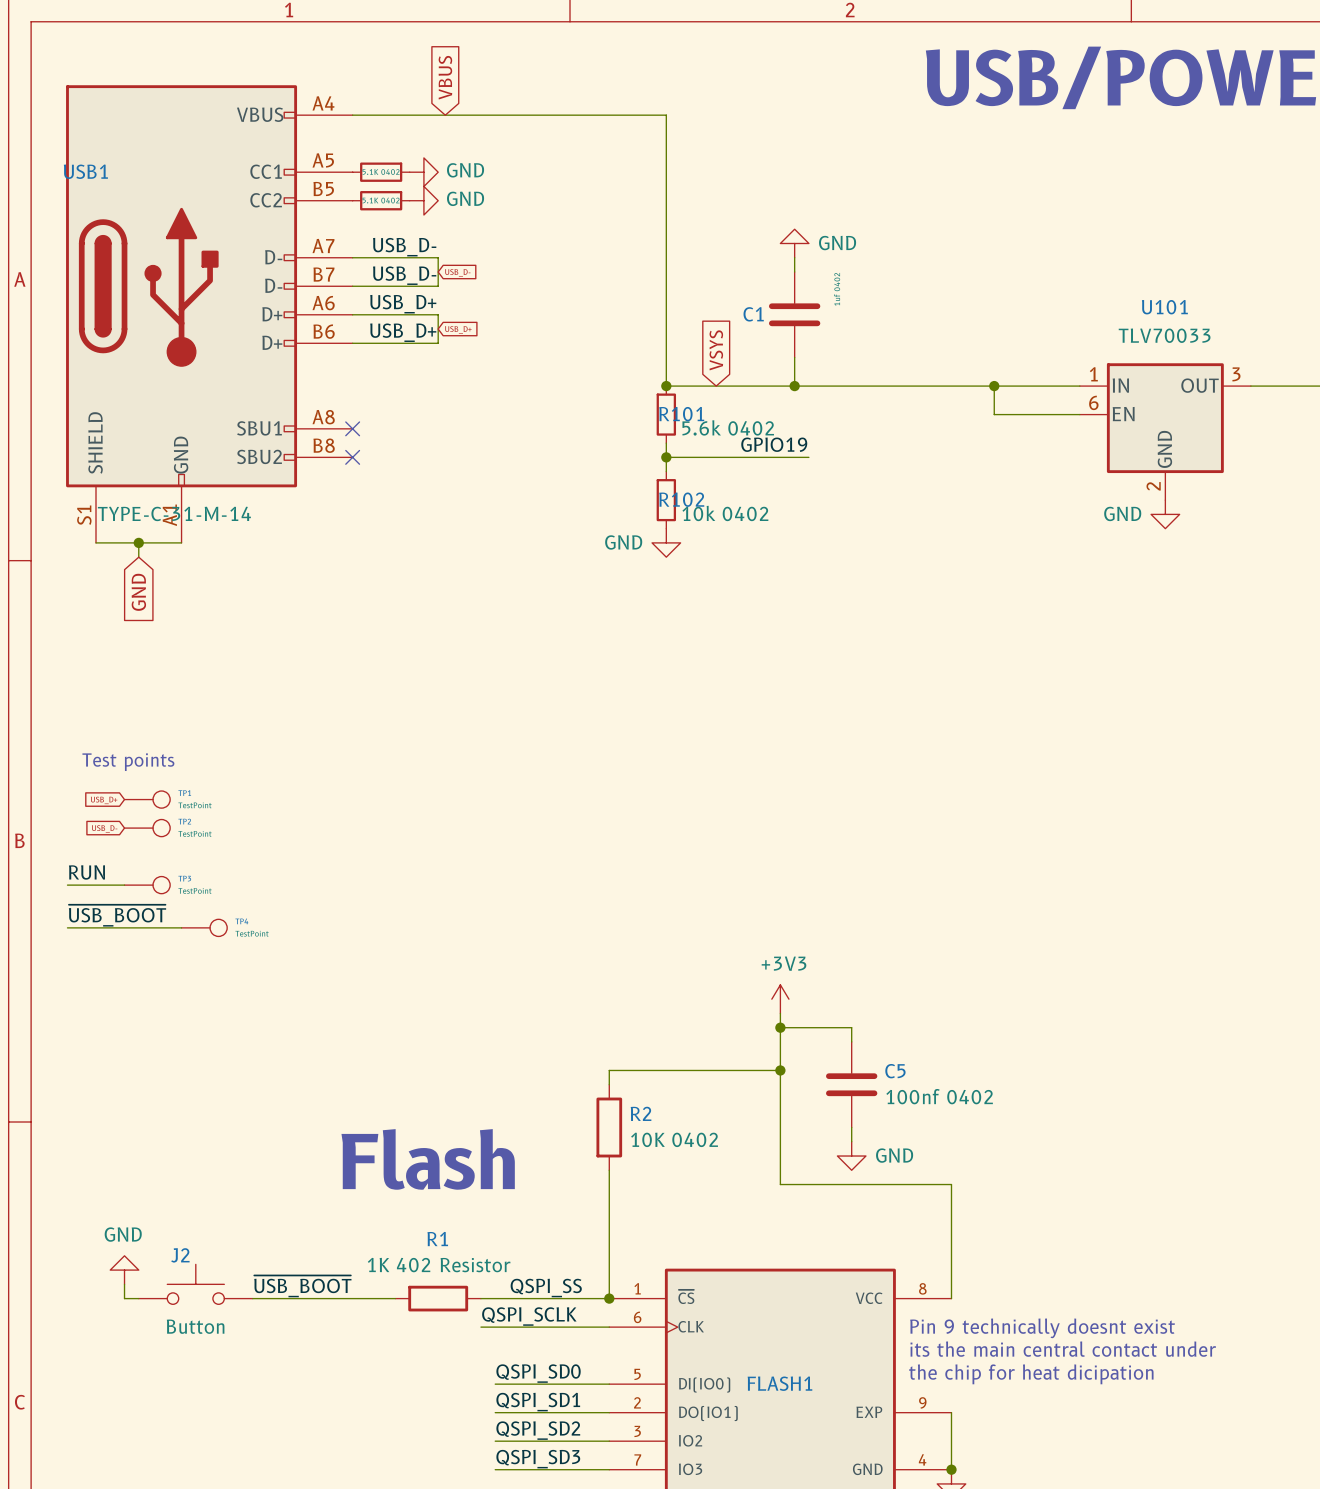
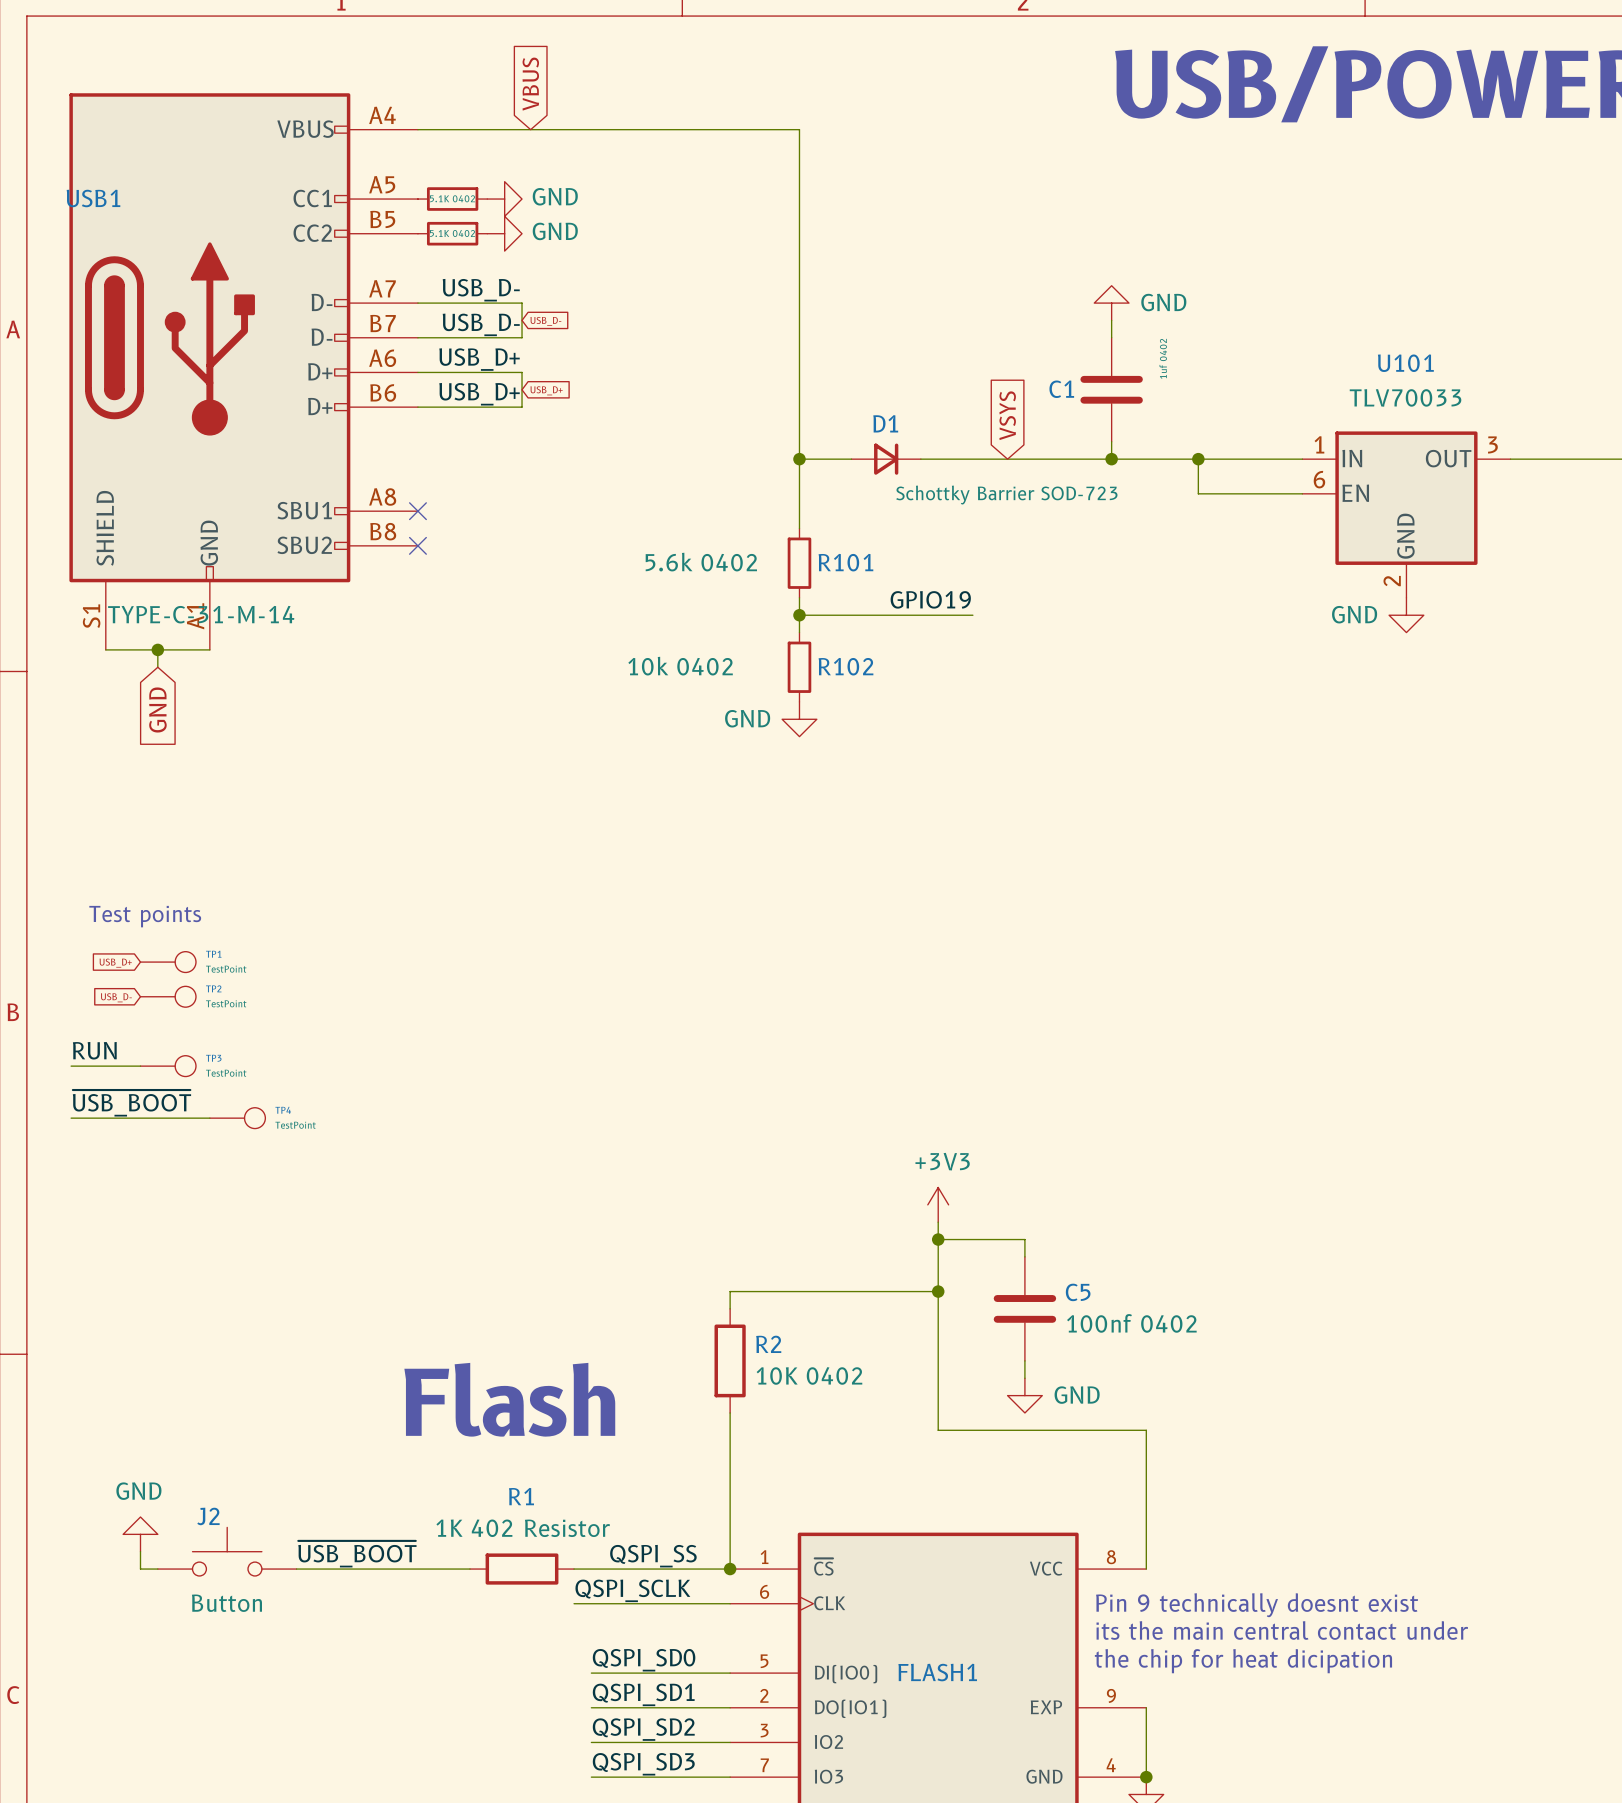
power symbol position: GND (794, 243) -> GND (1111, 303)
wire: (794, 257) (794, 272) -> (1111, 320) (1111, 337)
C1 position: (794, 314) -> (1111, 389)
global label position: VSYS (716, 350) -> VSYS (1007, 415)
wire: (794, 357) (794, 386) -> (799, 597) (799, 632)
wire: none -> (1111, 441) (1111, 459)
D1: none -> Schottky Barrier SOD-723 (886, 459)
junction: (794, 386) -> none
junction: none -> (1111, 459)
R101 position: (666, 414) -> (799, 563)
R101 name position: R101 (681, 414) -> R101 (845, 562)
R101 value position: 5.6k 0402 (728, 427) -> 5.6k 0402 (701, 562)
wire: (666, 443) (666, 471) -> (799, 528) (799, 459)
label position: GPIO19 (774, 444) -> GPIO19 (930, 599)
wire: (666, 457) (808, 457) -> (799, 615) (972, 615)
junction position: (666, 457) -> (799, 615)
R102 name position: R102 (681, 499) -> R102 (845, 666)
R102 position: (666, 500) -> (799, 667)
R102 value position: 10k 0402 (725, 513) -> 10k 0402 (680, 666)
power symbol position: GND (666, 542) -> GND (799, 719)

